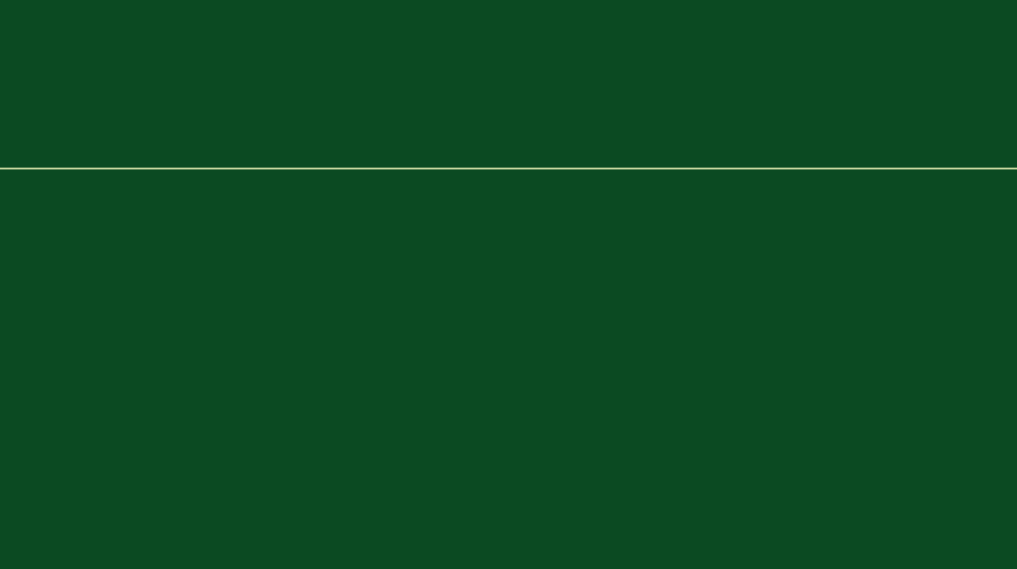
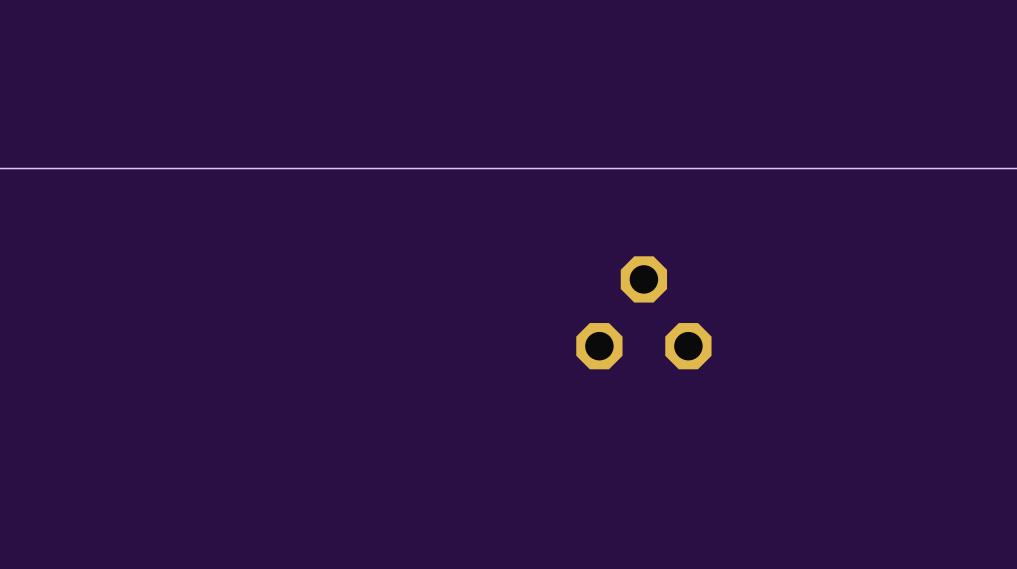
part: none -> (643, 312)

